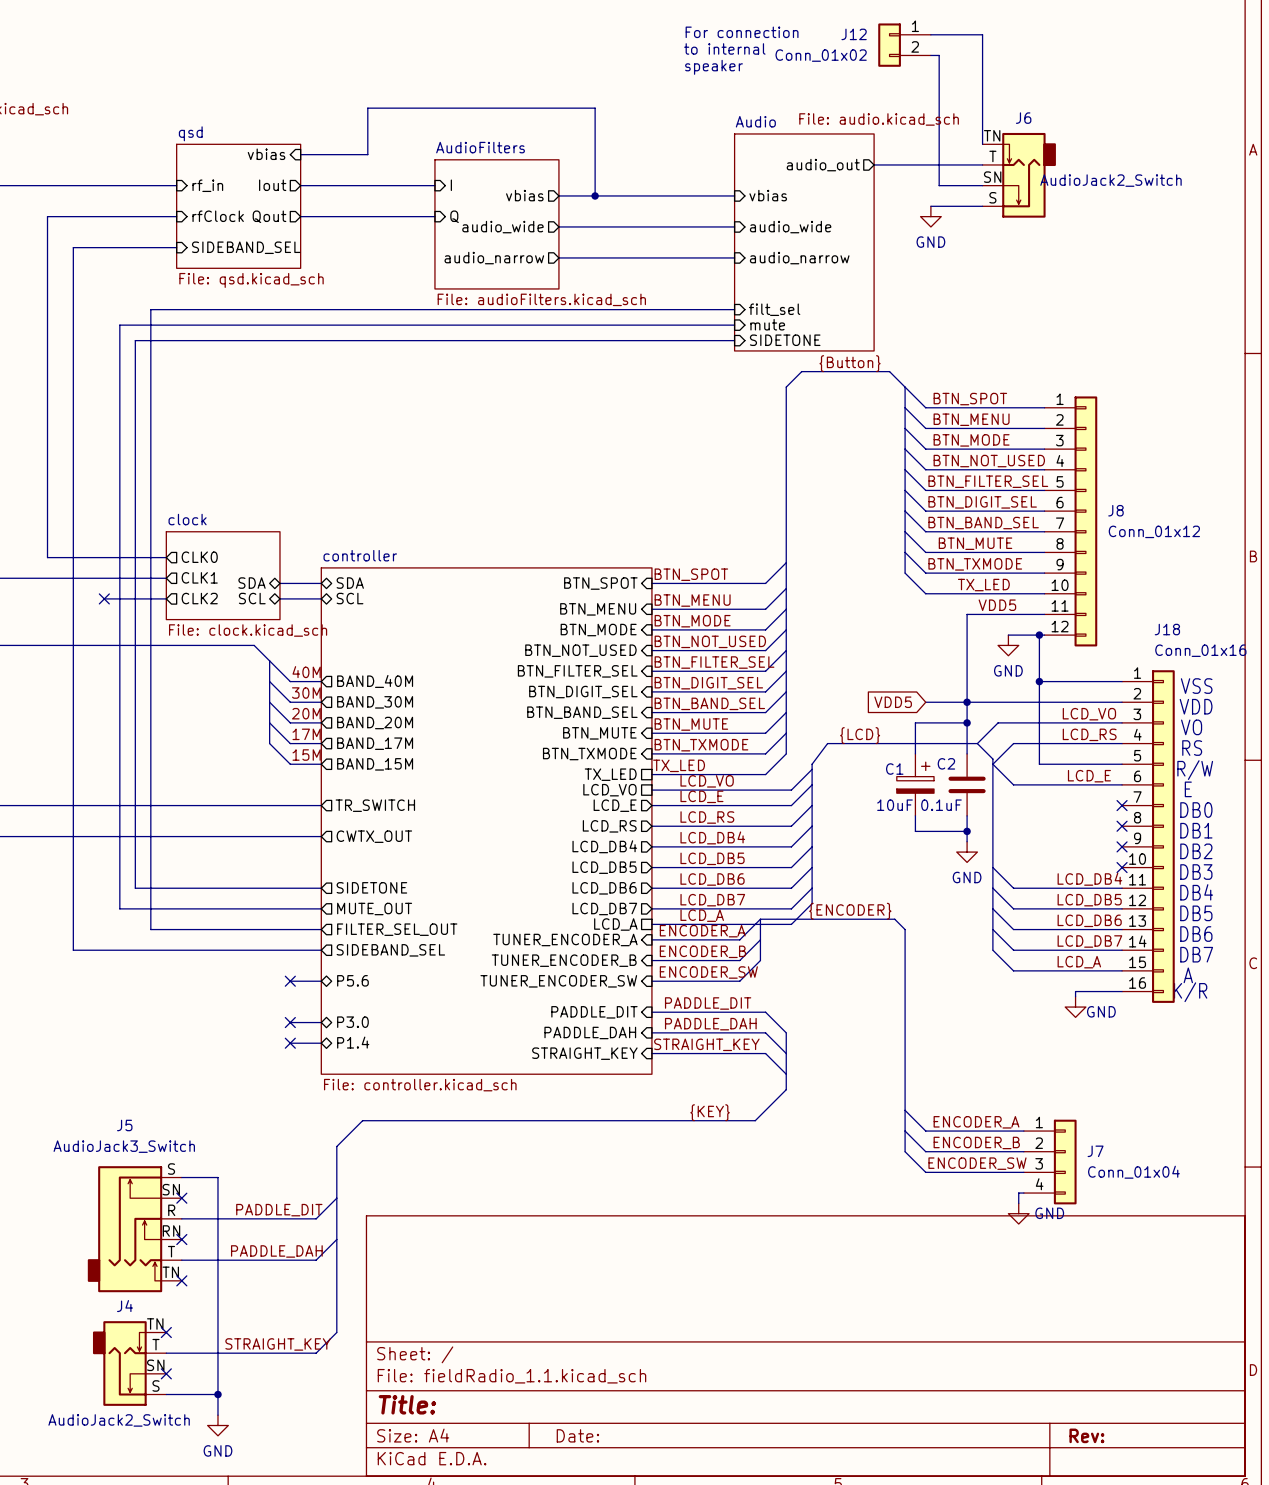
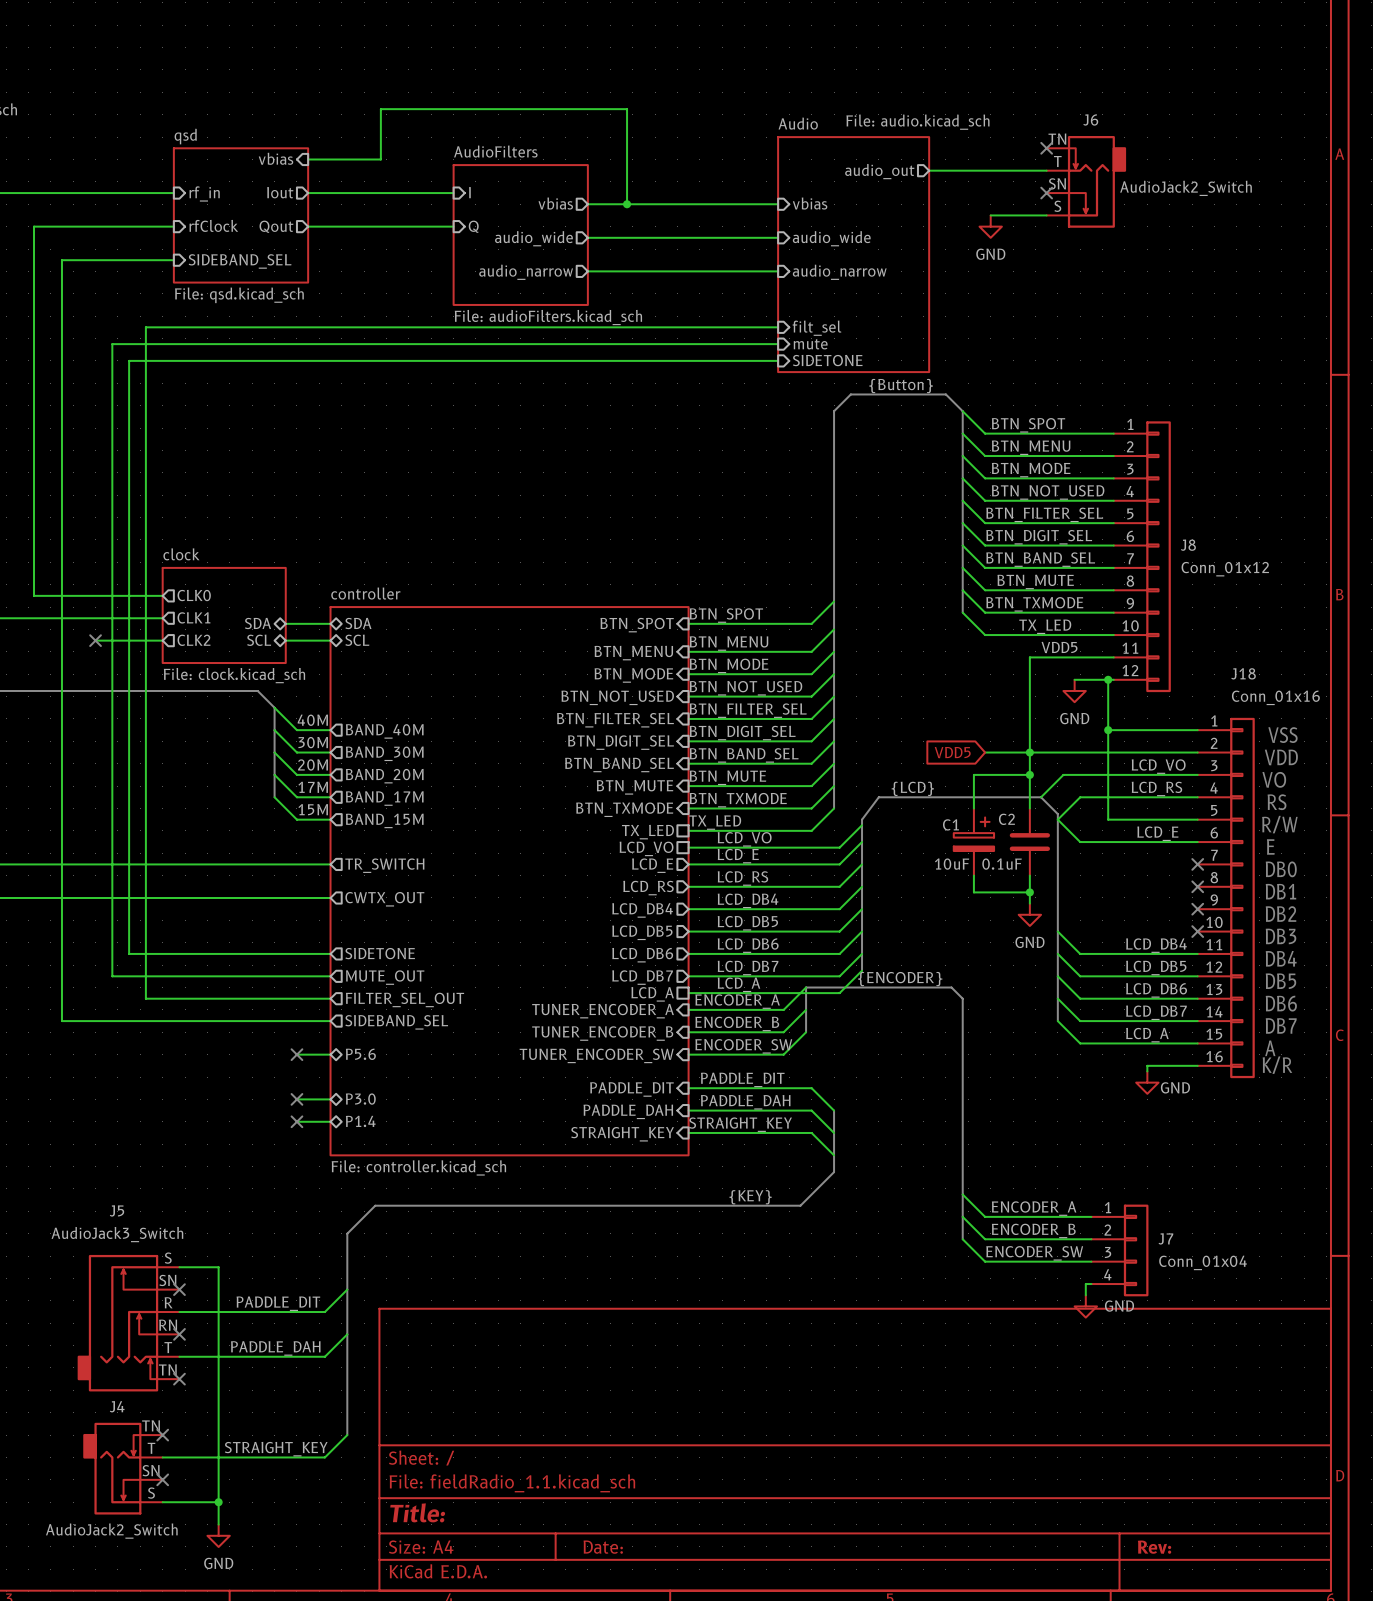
text: For connection (742, 32) -> none
wire: (930, 34) (982, 34) (982, 144) -> none
J12: Conn_01x02 (904, 45) -> none
text: to internal (724, 48) -> none
wire: (930, 55) (939, 55) (939, 185) (982, 185) -> none
text: speaker (714, 67) -> none
no-connect mark: none -> (1046, 148)
no-connect mark: none -> (1046, 193)

